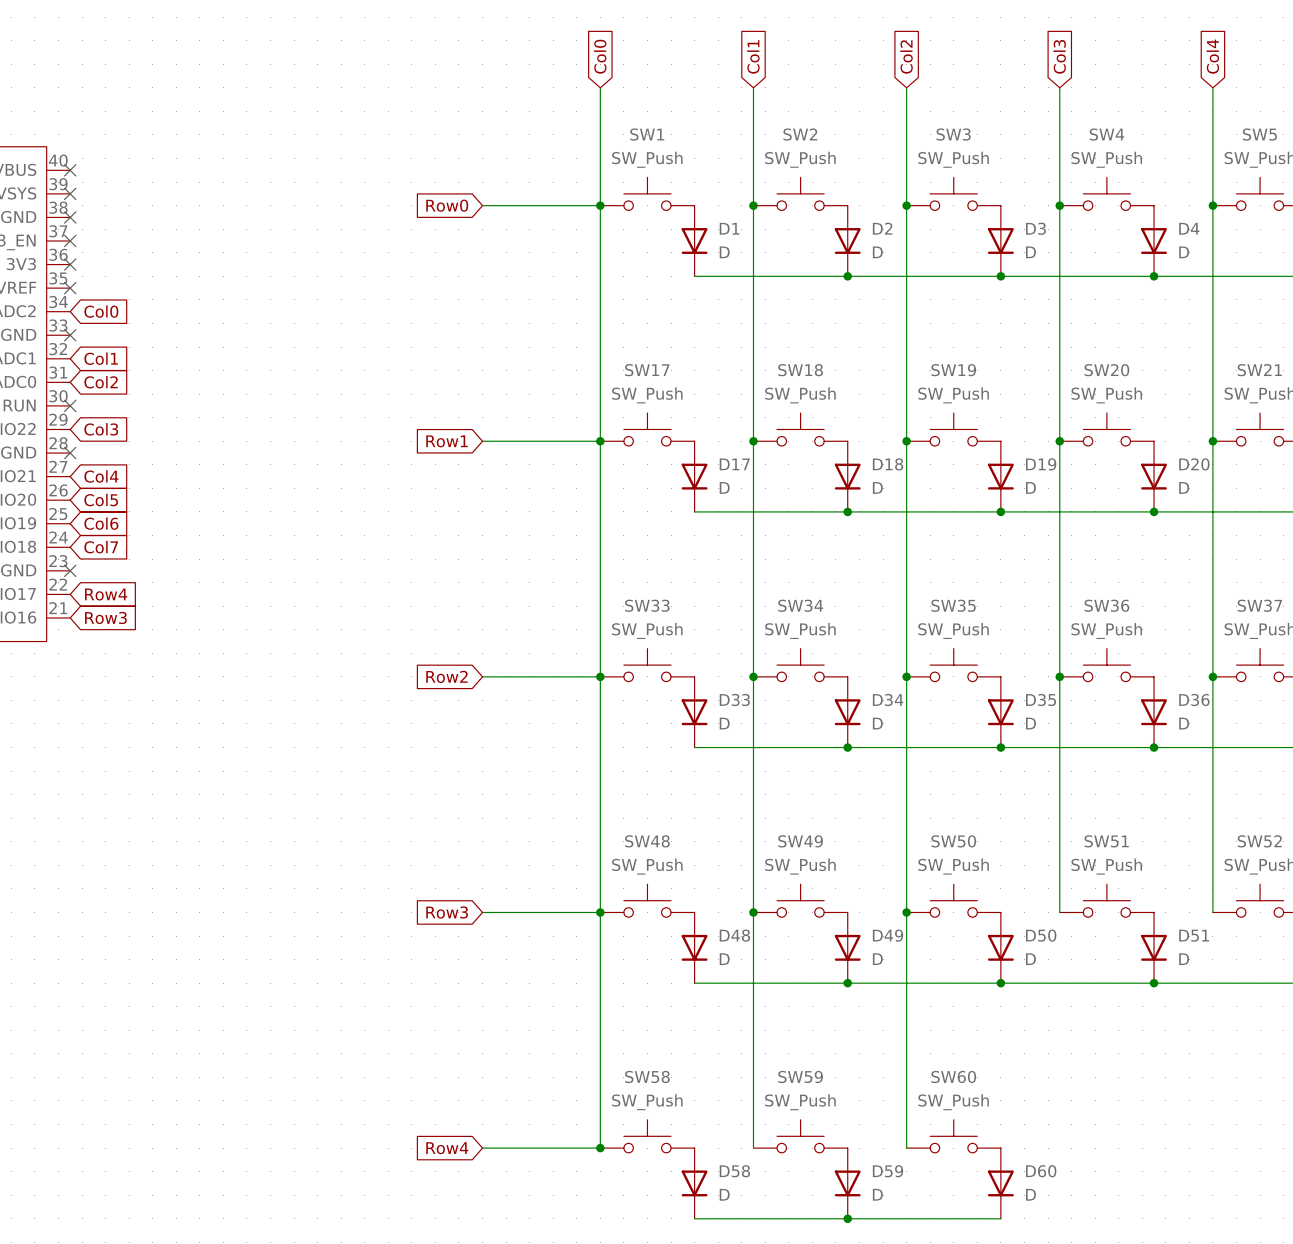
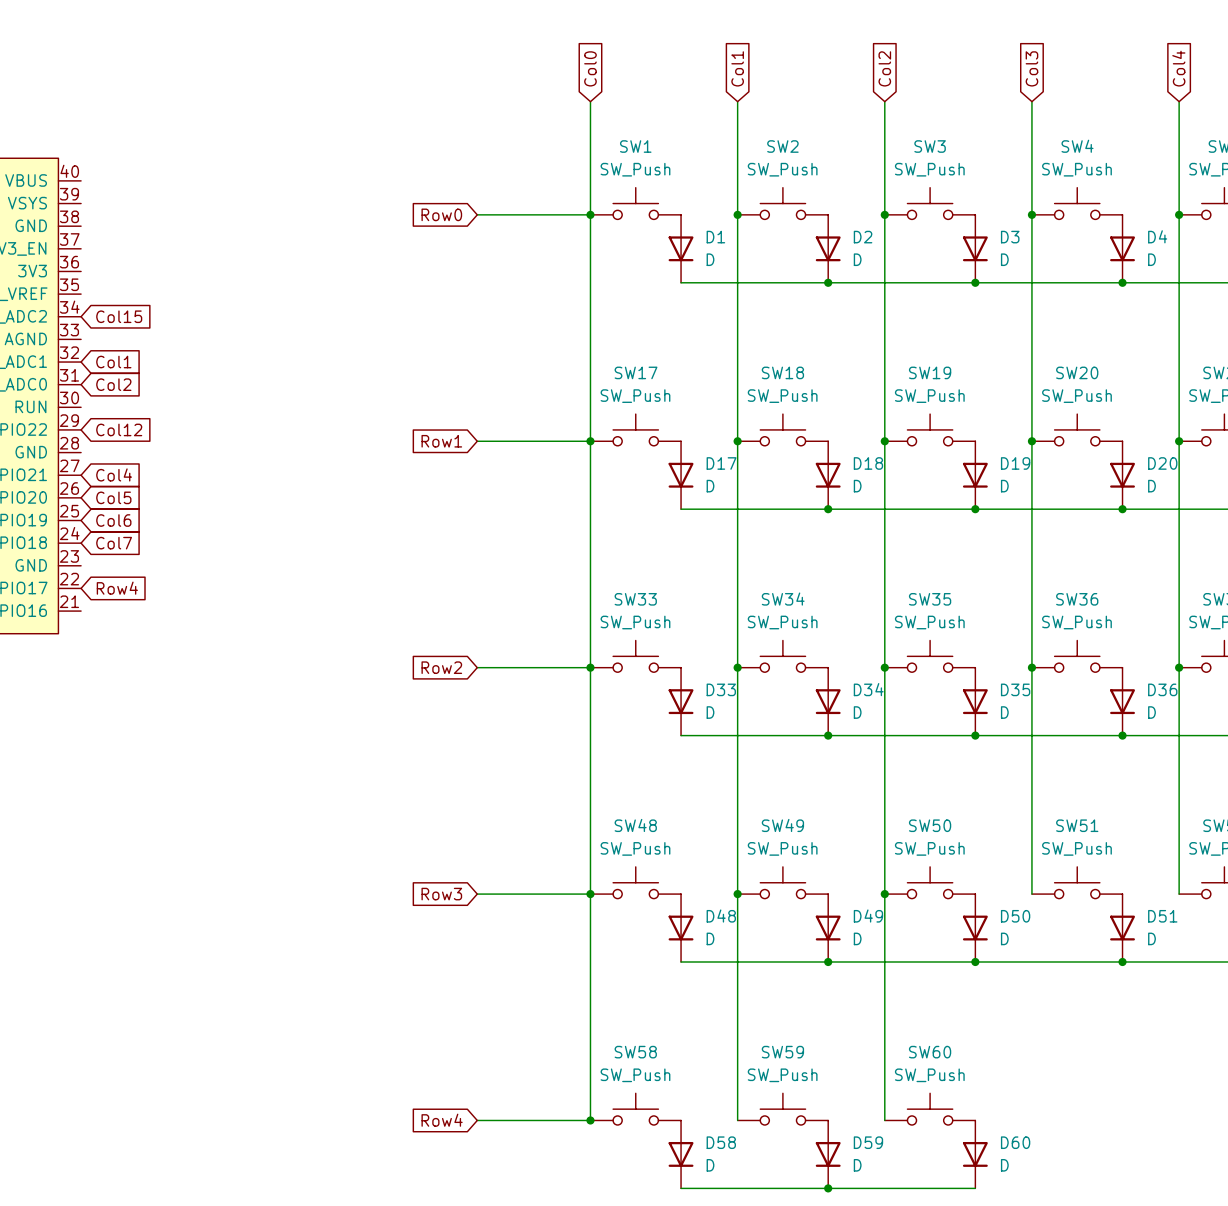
no-connect mark: (70, 170) -> none
no-connect mark: (70, 193) -> none
no-connect mark: (70, 217) -> none
no-connect mark: (70, 241) -> none
no-connect mark: (70, 264) -> none
no-connect mark: (70, 288) -> none
global label: Col0 (101, 311) -> Col15 (119, 316)
no-connect mark: (70, 335) -> none
no-connect mark: (70, 405) -> none
global label: Col3 (101, 429) -> Col12 (119, 429)
no-connect mark: (70, 453) -> none
no-connect mark: (70, 570) -> none
global label: Row3 (105, 617) -> none

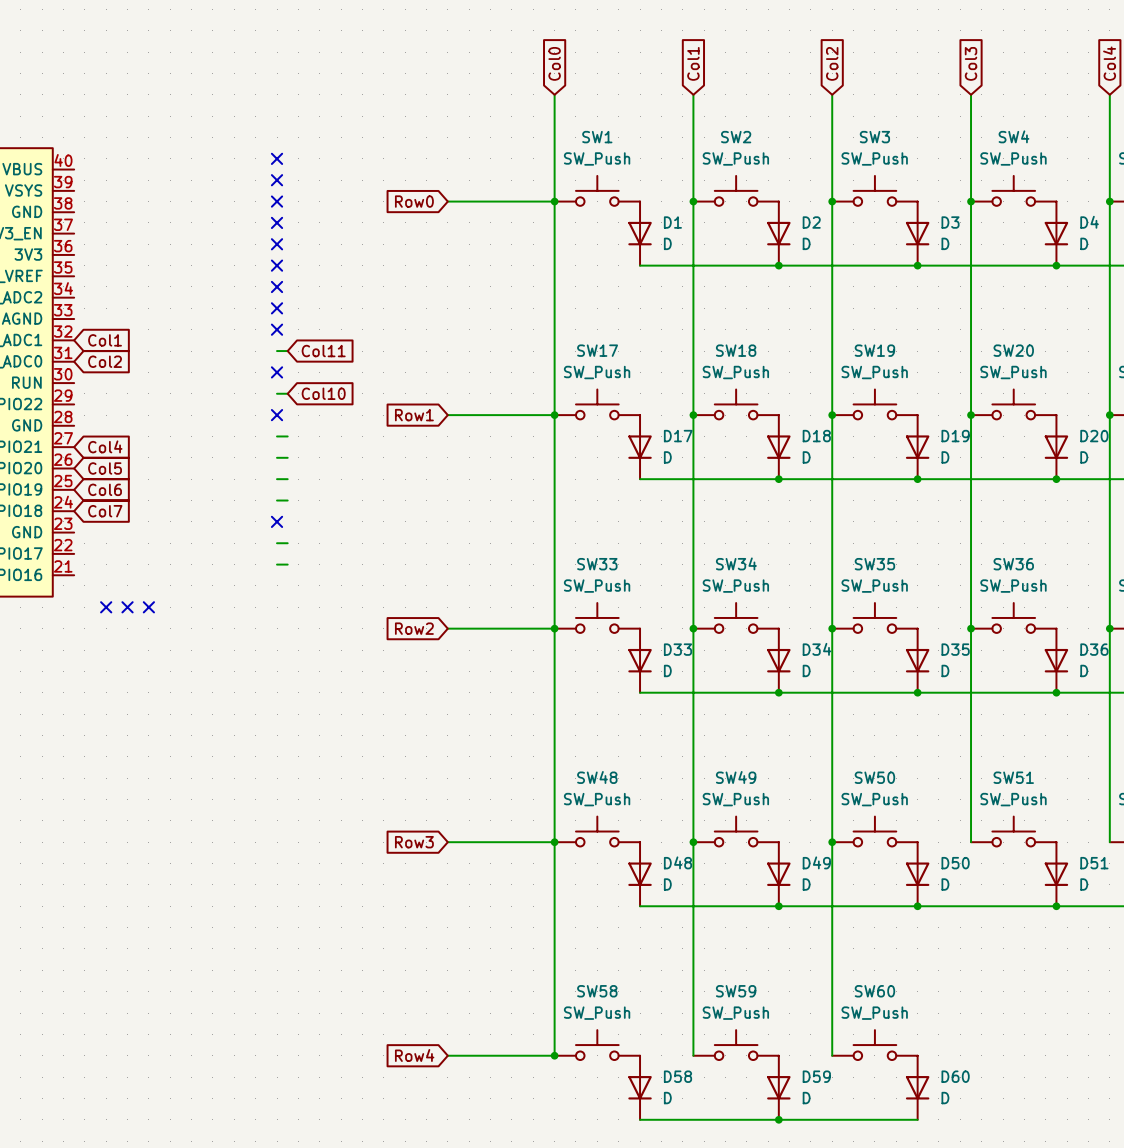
no-connect mark: none -> (277, 158)
no-connect mark: none -> (277, 180)
no-connect mark: none -> (277, 201)
no-connect mark: none -> (277, 222)
no-connect mark: none -> (277, 244)
no-connect mark: none -> (277, 265)
no-connect mark: none -> (277, 286)
global label: Col15 (119, 316) -> none
no-connect mark: none -> (277, 308)
no-connect mark: none -> (277, 329)
wire: none -> (277, 351) (287, 351)
global label: none -> Col11 (323, 351)
no-connect mark: none -> (277, 372)
wire: none -> (277, 393) (287, 393)
global label: none -> Col10 (323, 393)
global label: Col12 (119, 429) -> none
no-connect mark: none -> (277, 415)
wire: none -> (277, 436) (287, 436)
wire: none -> (277, 457) (287, 457)
wire: none -> (277, 479) (287, 479)
wire: none -> (277, 500) (287, 500)
no-connect mark: none -> (277, 521)
wire: none -> (277, 543) (287, 543)
global label: Row4 (117, 588) -> none
wire: none -> (277, 564) (287, 564)
no-connect mark: none -> (106, 607)
no-connect mark: none -> (127, 607)
no-connect mark: none -> (148, 607)

